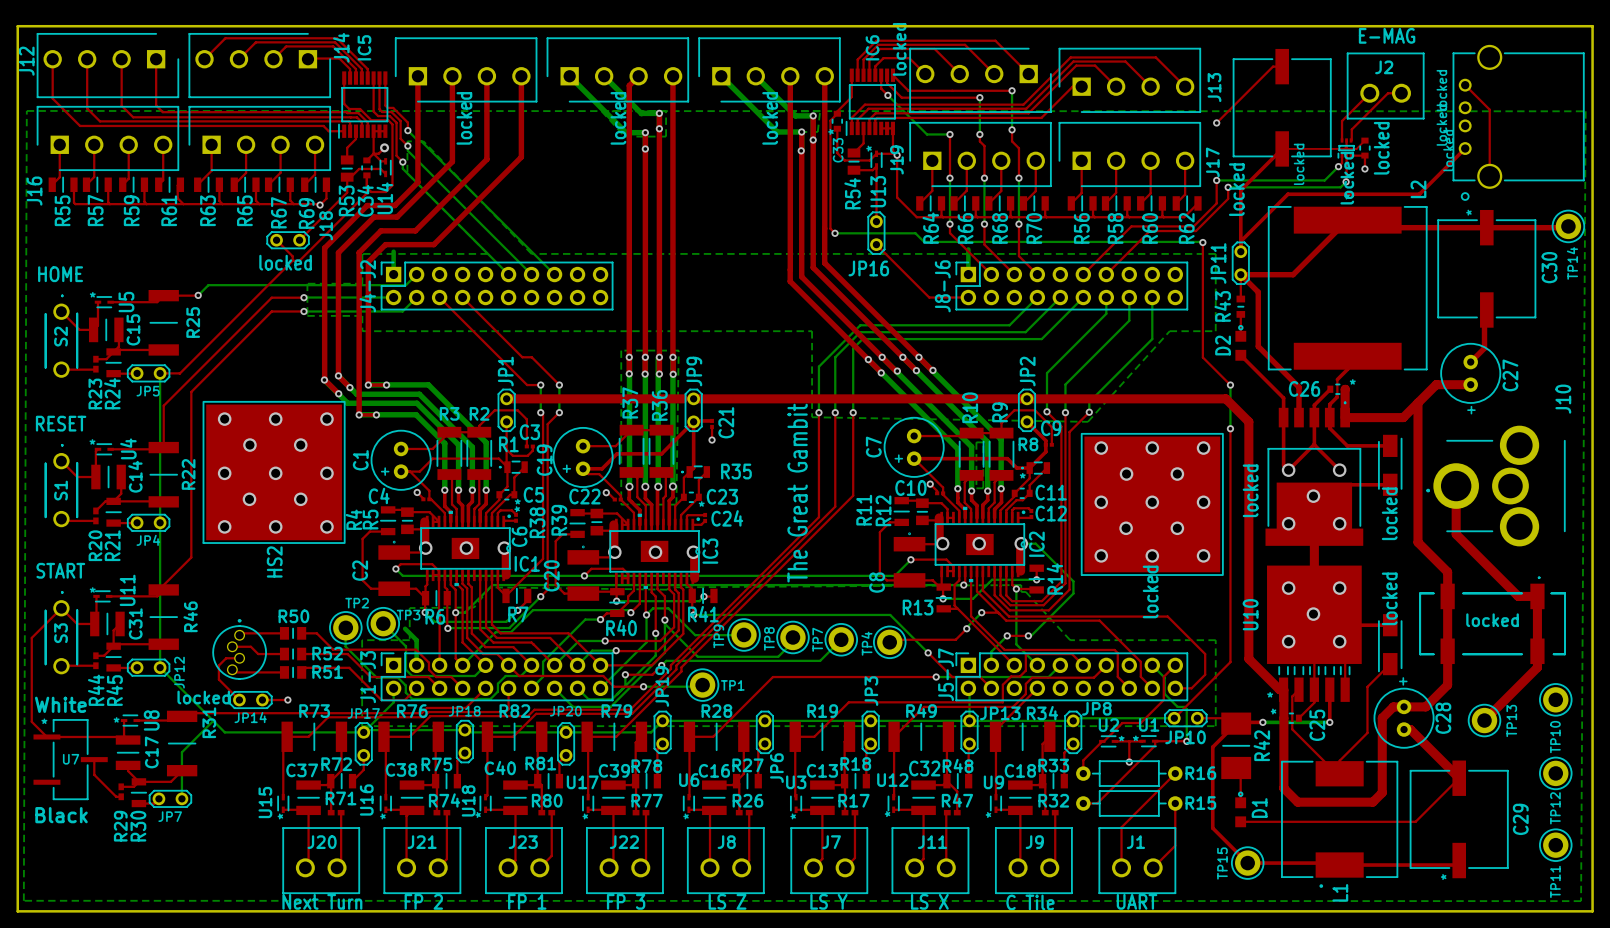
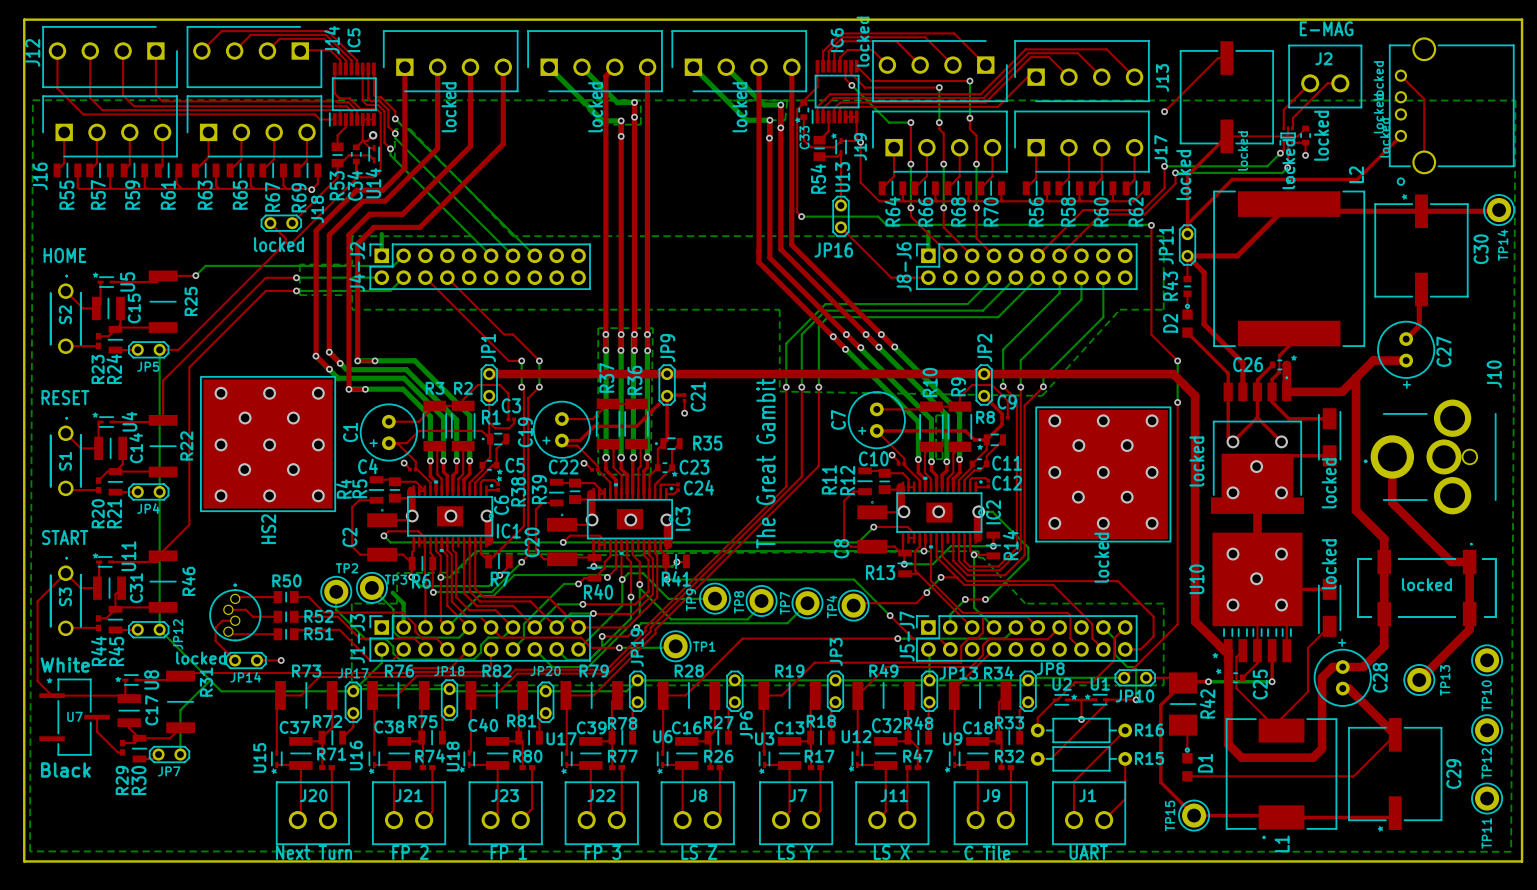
J10 footprint: [1426, 425, 1566, 547] -> [1363, 399, 1497, 515]

